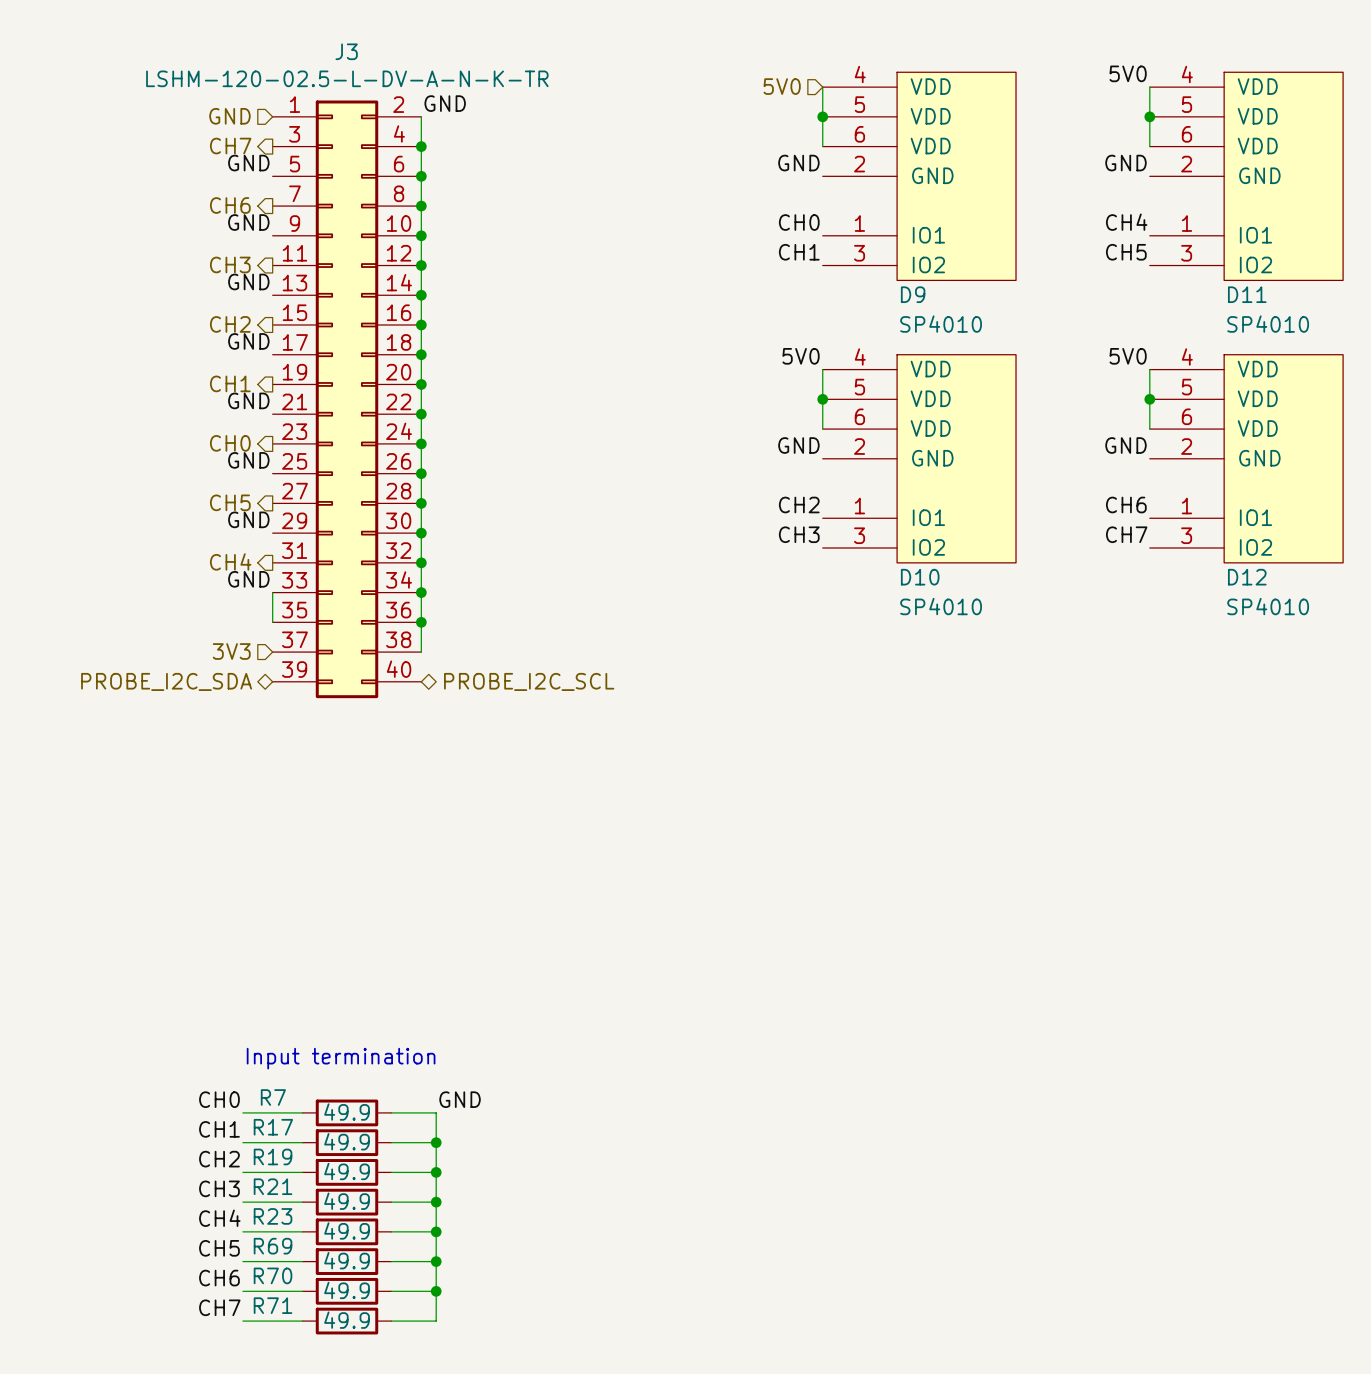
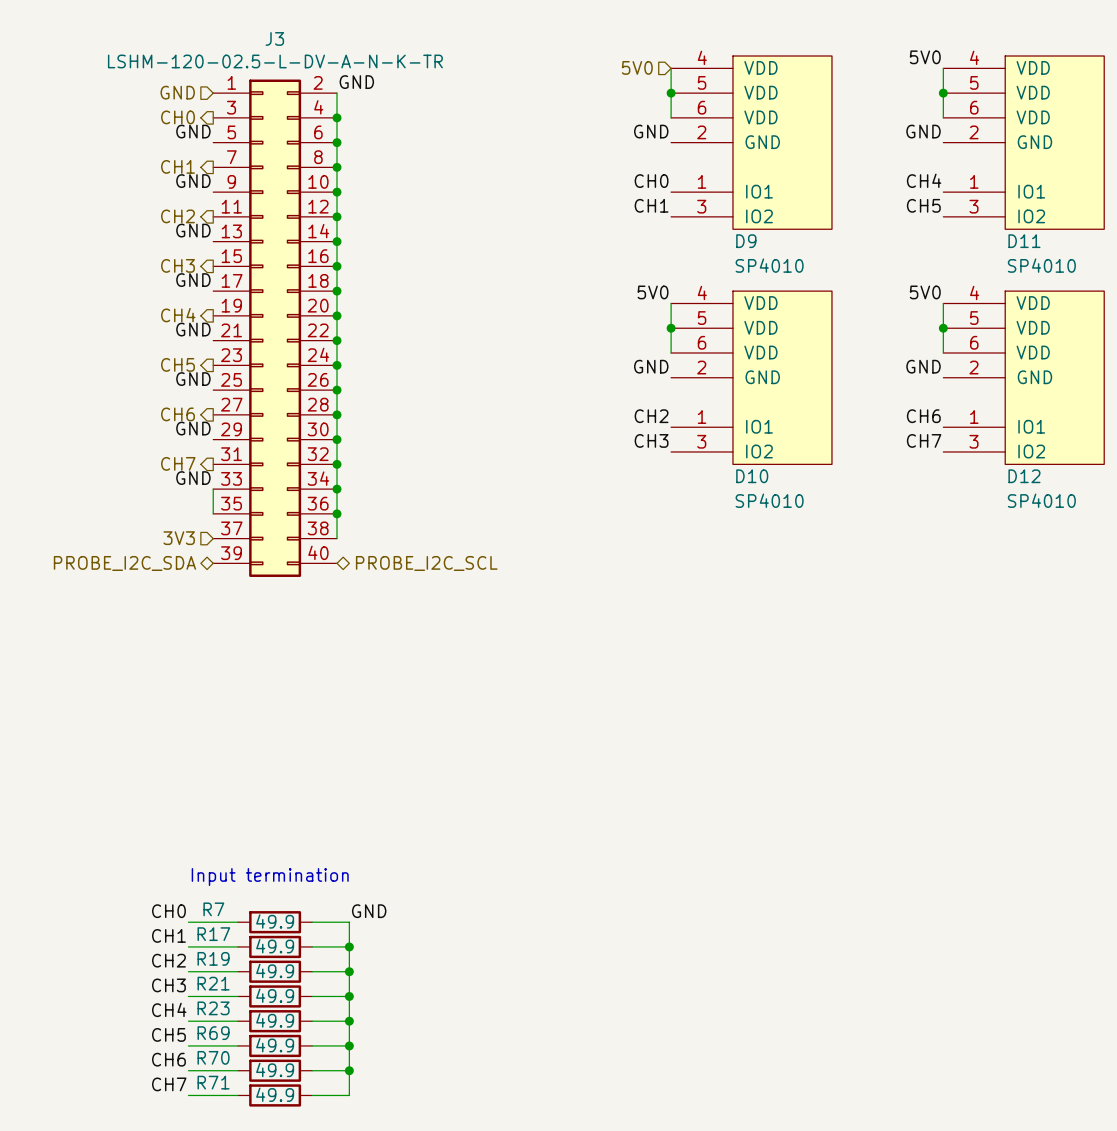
hierarchical label: CH7 (230, 146) -> CH0 (177, 117)
hierarchical label: CH6 (230, 205) -> CH1 (177, 166)
hierarchical label: CH3 (230, 264) -> CH2 (177, 216)
hierarchical label: CH2 (230, 324) -> CH3 (177, 265)
hierarchical label: CH1 (230, 383) -> CH4 (178, 315)
hierarchical label: CH0 (230, 443) -> CH5 (177, 364)
hierarchical label: CH5 (230, 502) -> CH6 (177, 414)
hierarchical label: CH4 (230, 561) -> CH7 (178, 463)

